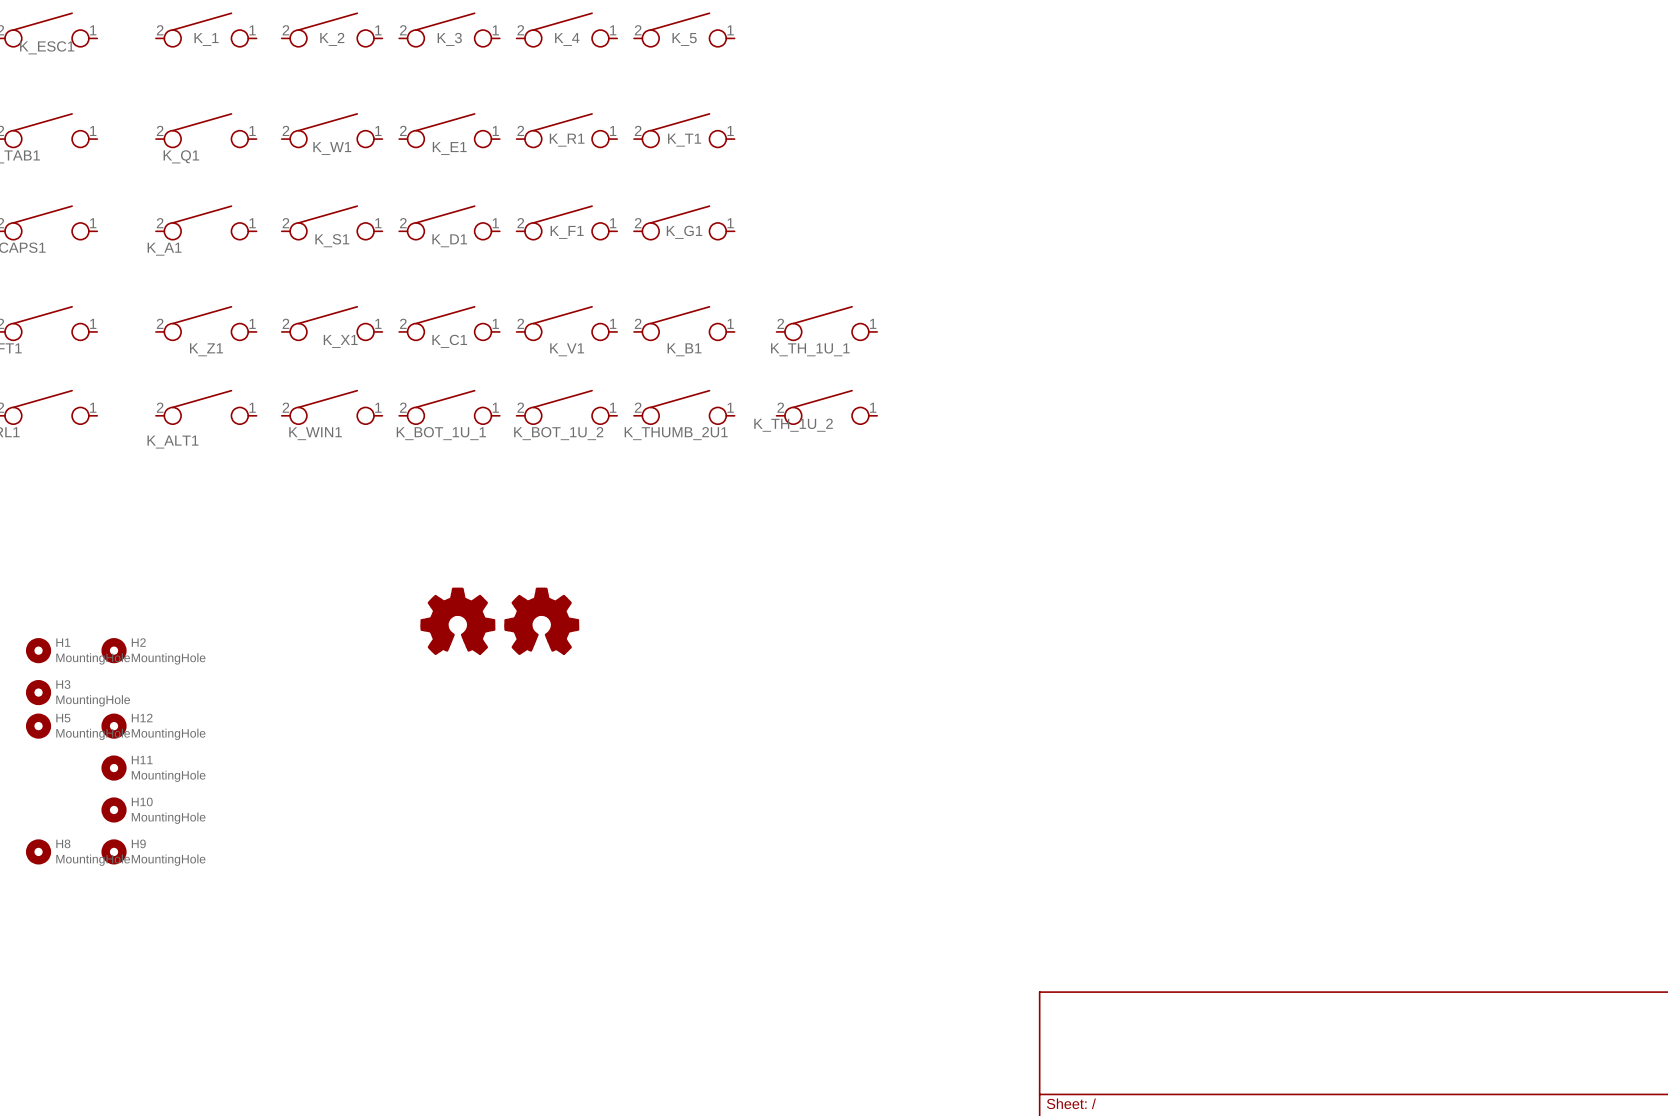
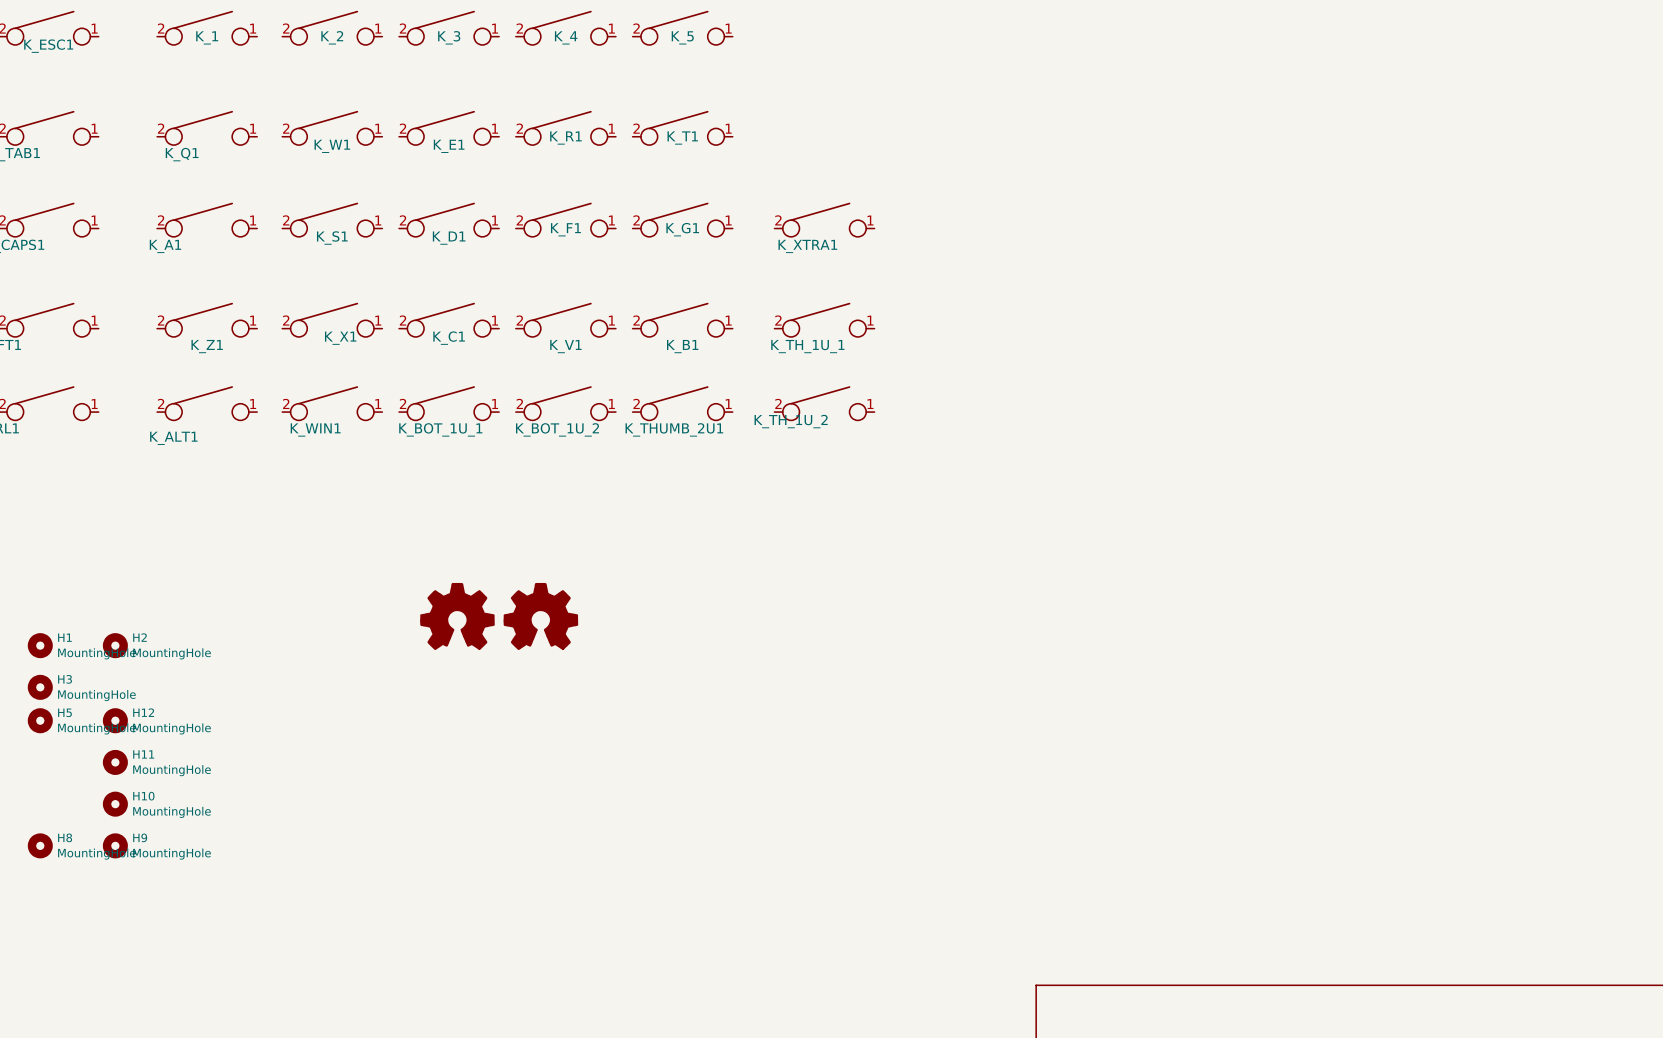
K_XTRA1: none -> (824, 219)

